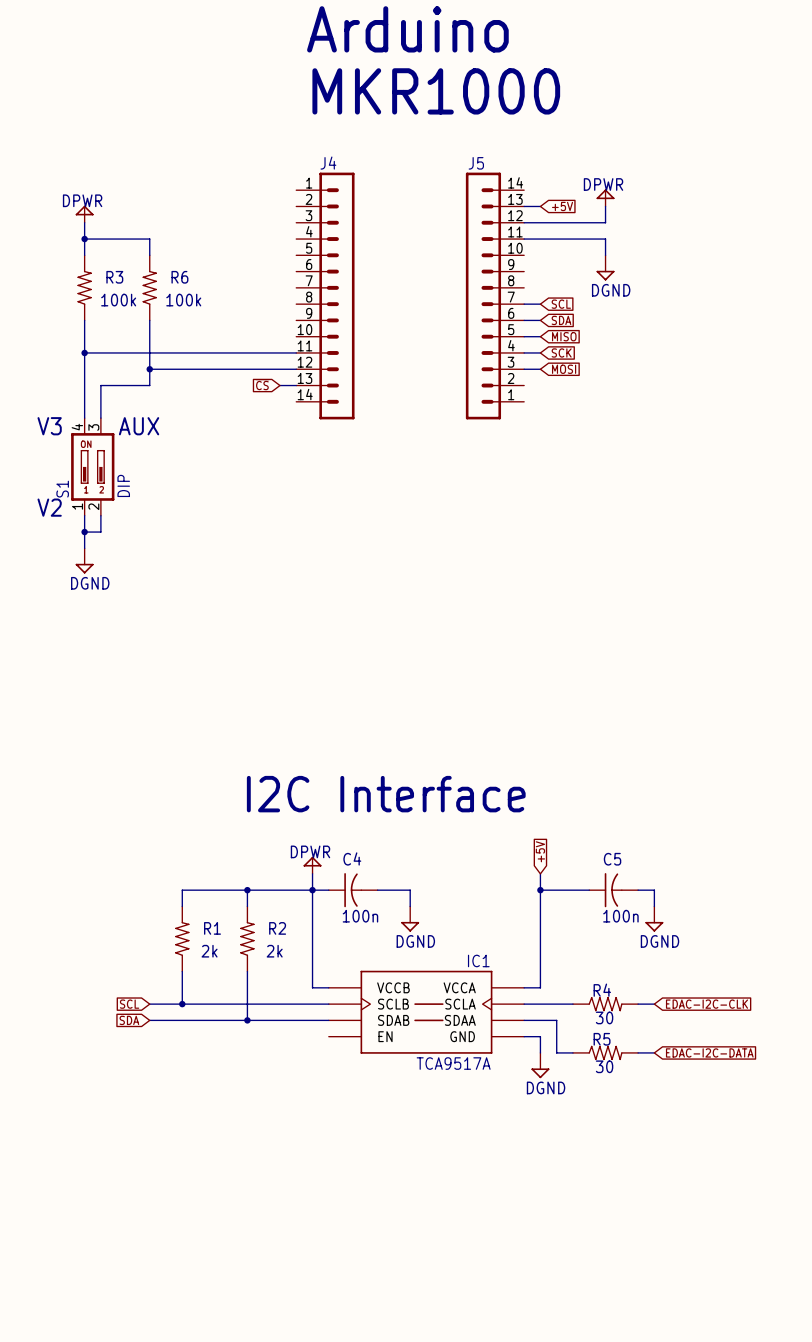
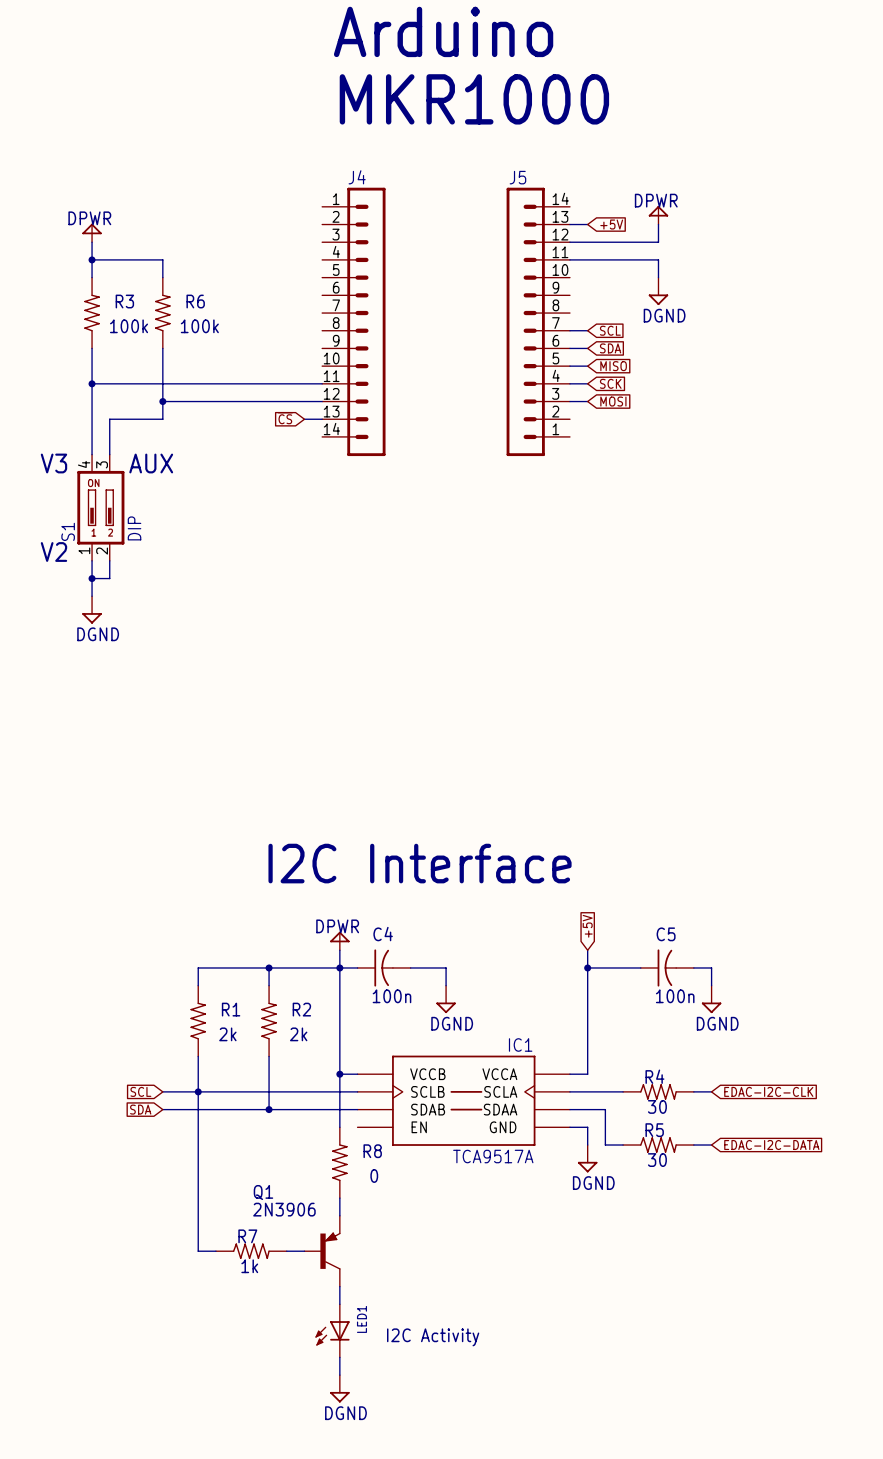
wire: none -> (339, 1074) (339, 1127)
junction: none -> (339, 1074)
wire: none -> (198, 1091) (198, 1251) (215, 1251)
R8: none -> 0 (339, 1162)
wire: none -> (339, 1198) (339, 1215)
R7: none -> 1k (251, 1251)
wire: none -> (286, 1251) (304, 1251)
Q1: none -> 2N3906 (322, 1251)
wire: none -> (339, 1286) (339, 1304)
LED1: none -> (332, 1330)
text: none -> I2C Activity (433, 1337)
wire: none -> (339, 1357) (339, 1375)
power symbol: none -> DGND (339, 1388)

